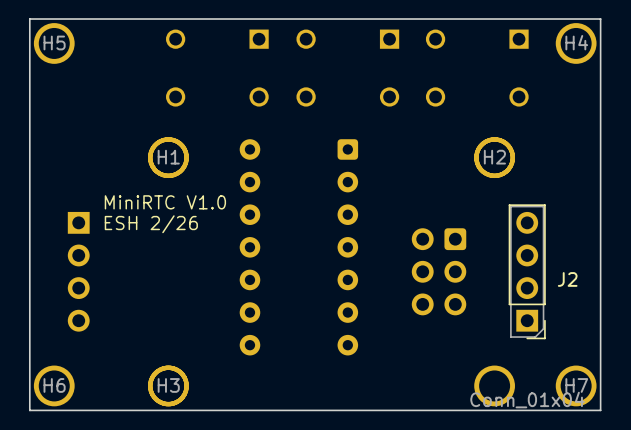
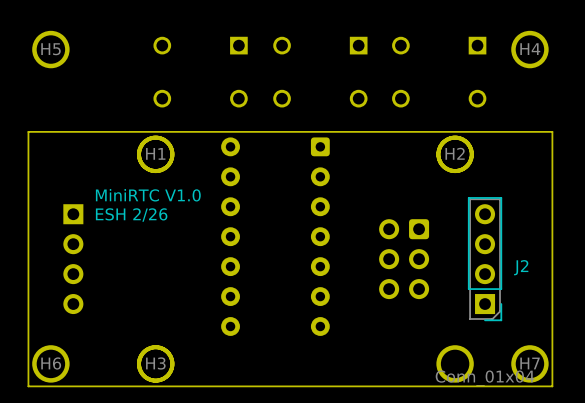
board edge: (29, 133) (29, 19) (600, 19) (600, 133) -> (28, 131) (552, 131)

